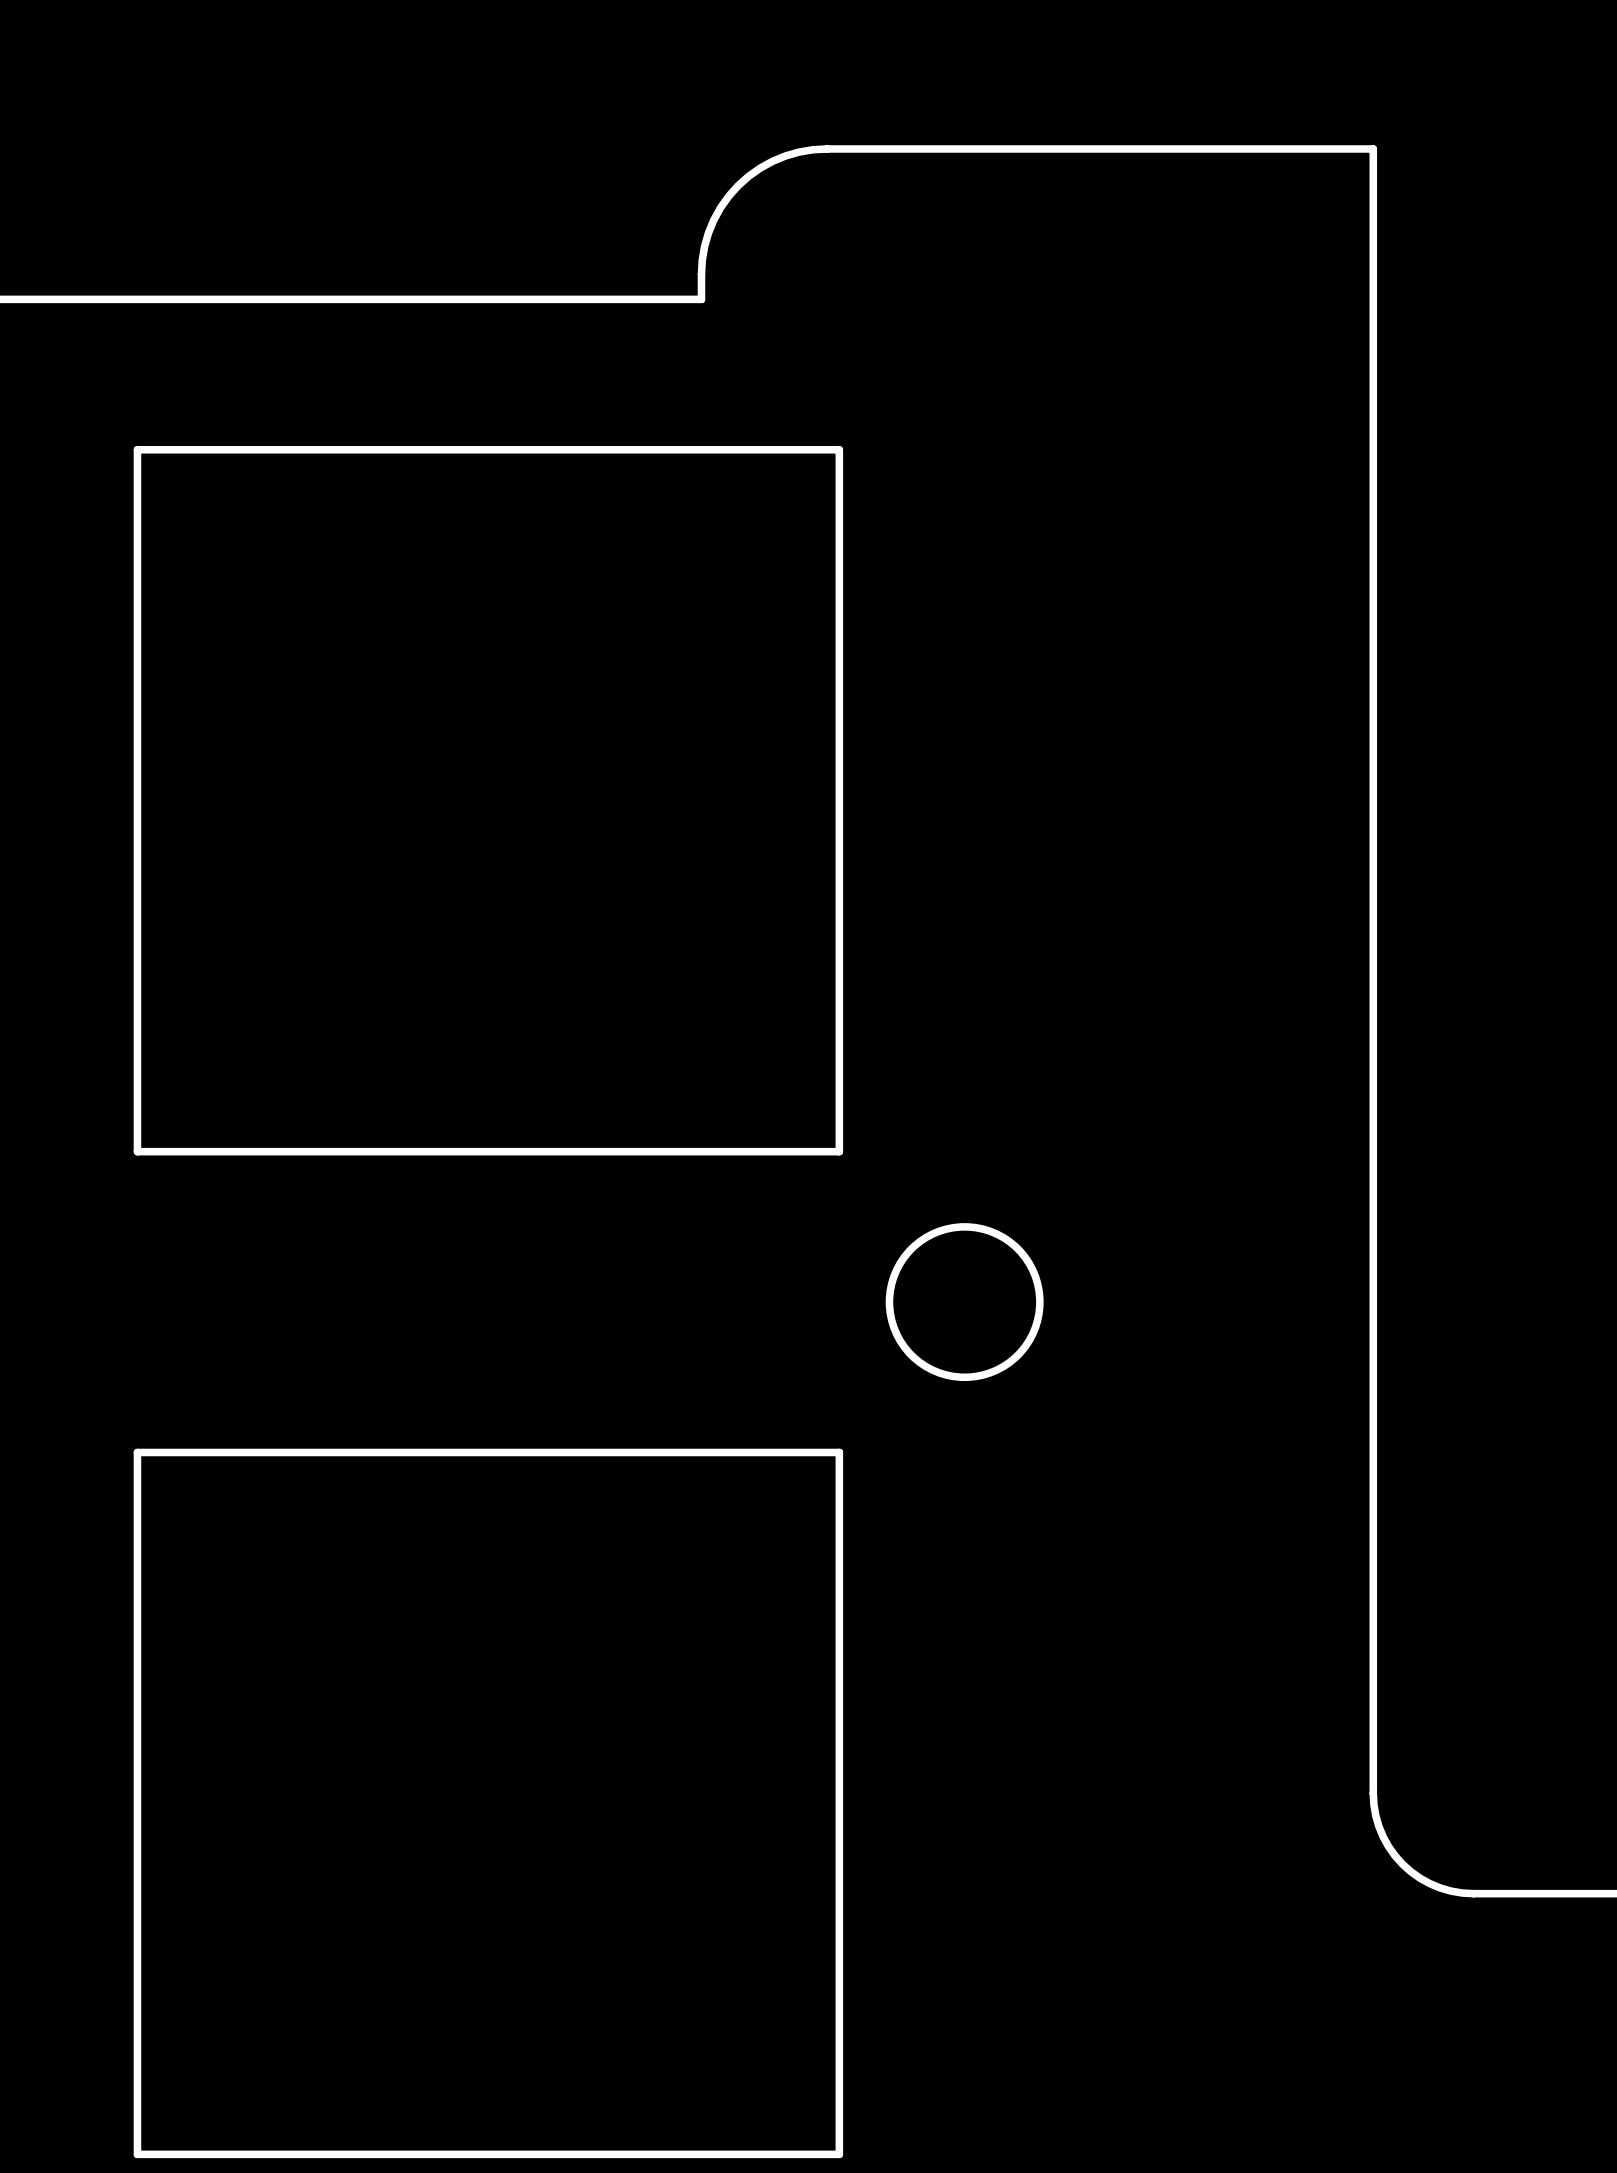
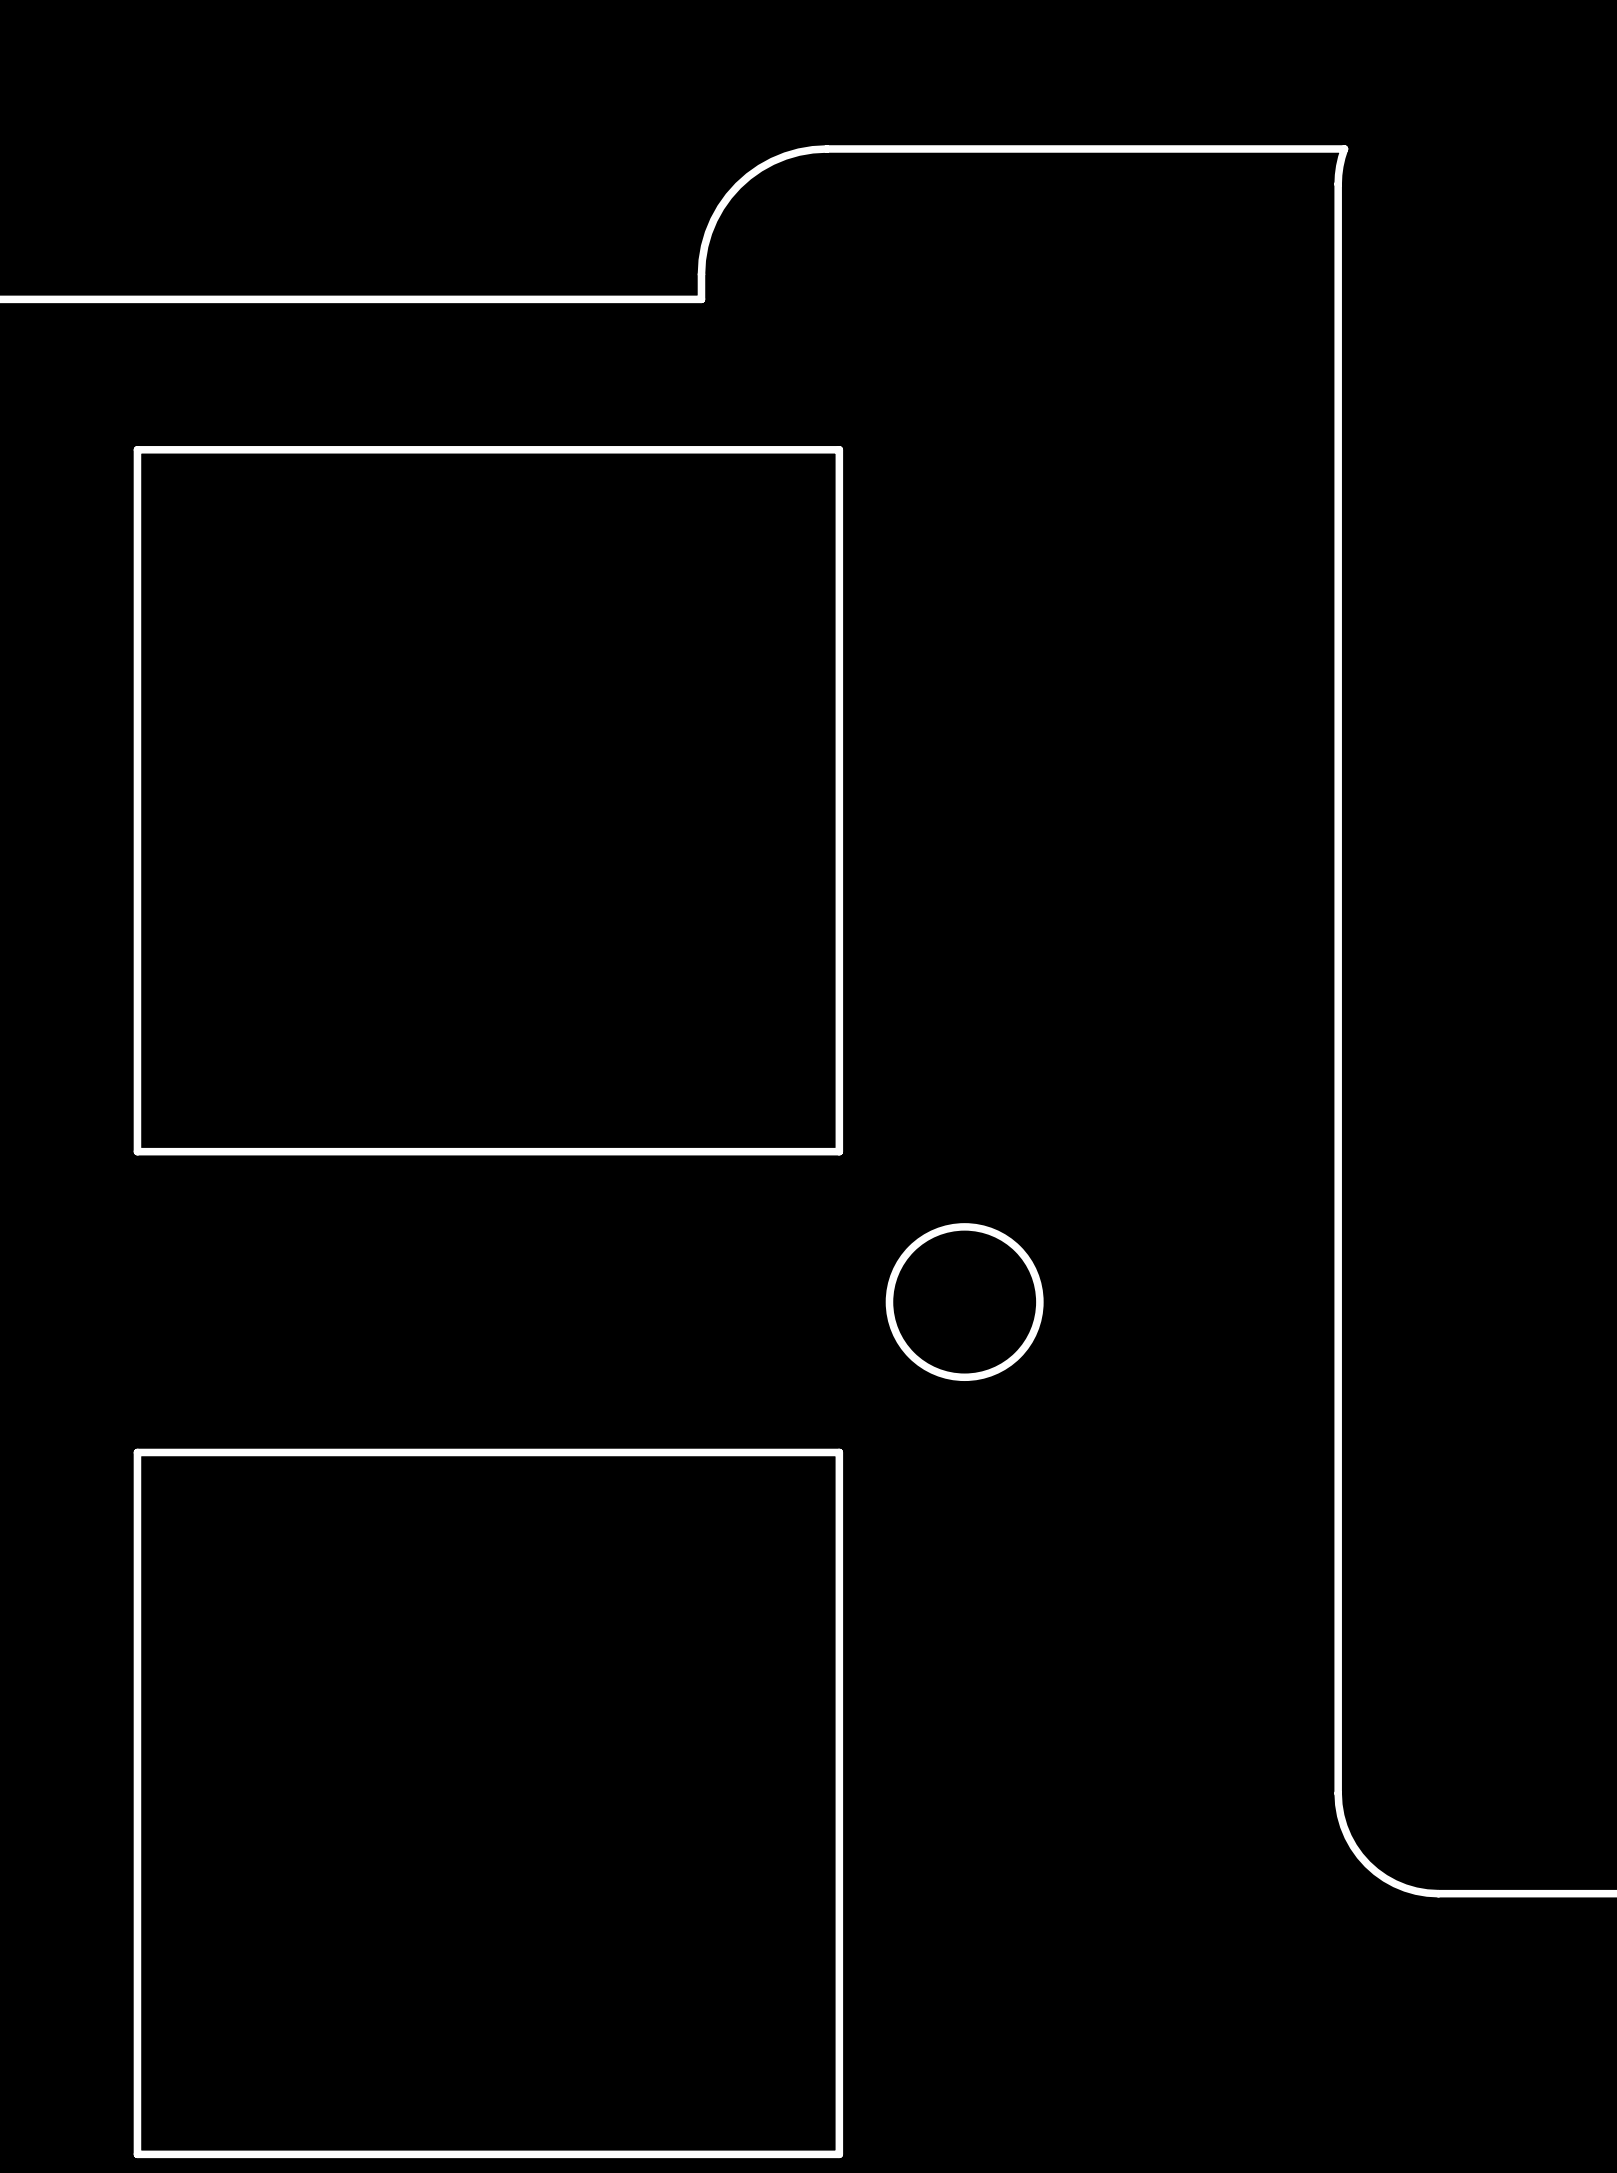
board edge: (1344, 148) (1373, 148) (1373, 1804) (1383, 1836) (1402, 1864) (1430, 1883) (1451, 1891) (1473, 1893) -> (1344, 148) (1339, 166) (1338, 184) (1338, 1804) (1343, 1826) (1353, 1846) (1367, 1864) (1385, 1878) (1416, 1891) (1438, 1893) (1473, 1893)

